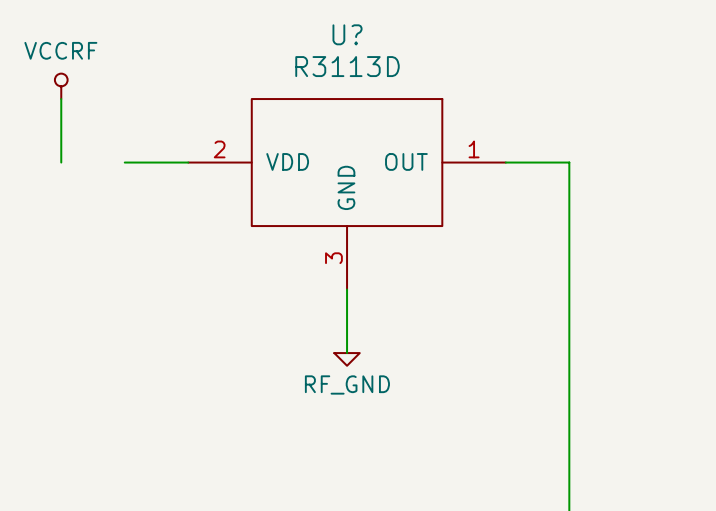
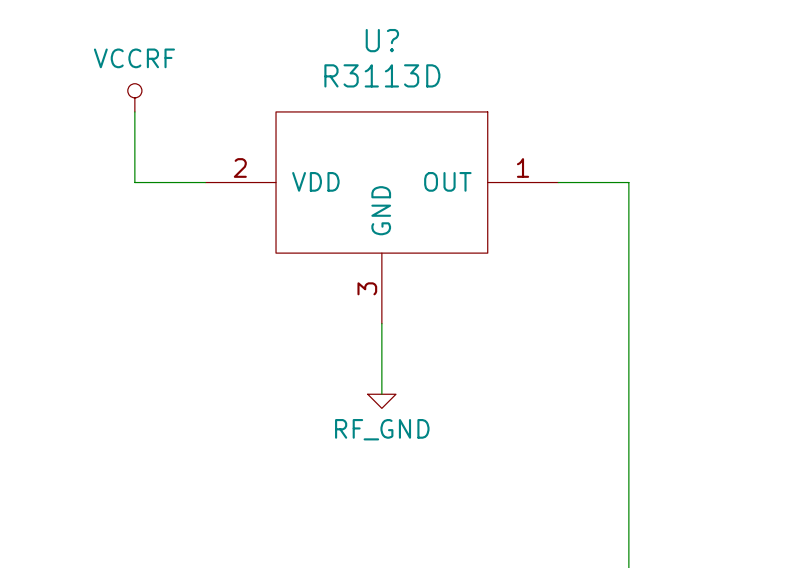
power symbol position: VCCRF (61, 86) -> VCCRF (134, 97)
wire: (61, 99) (61, 162) -> (134, 111) (134, 182)

